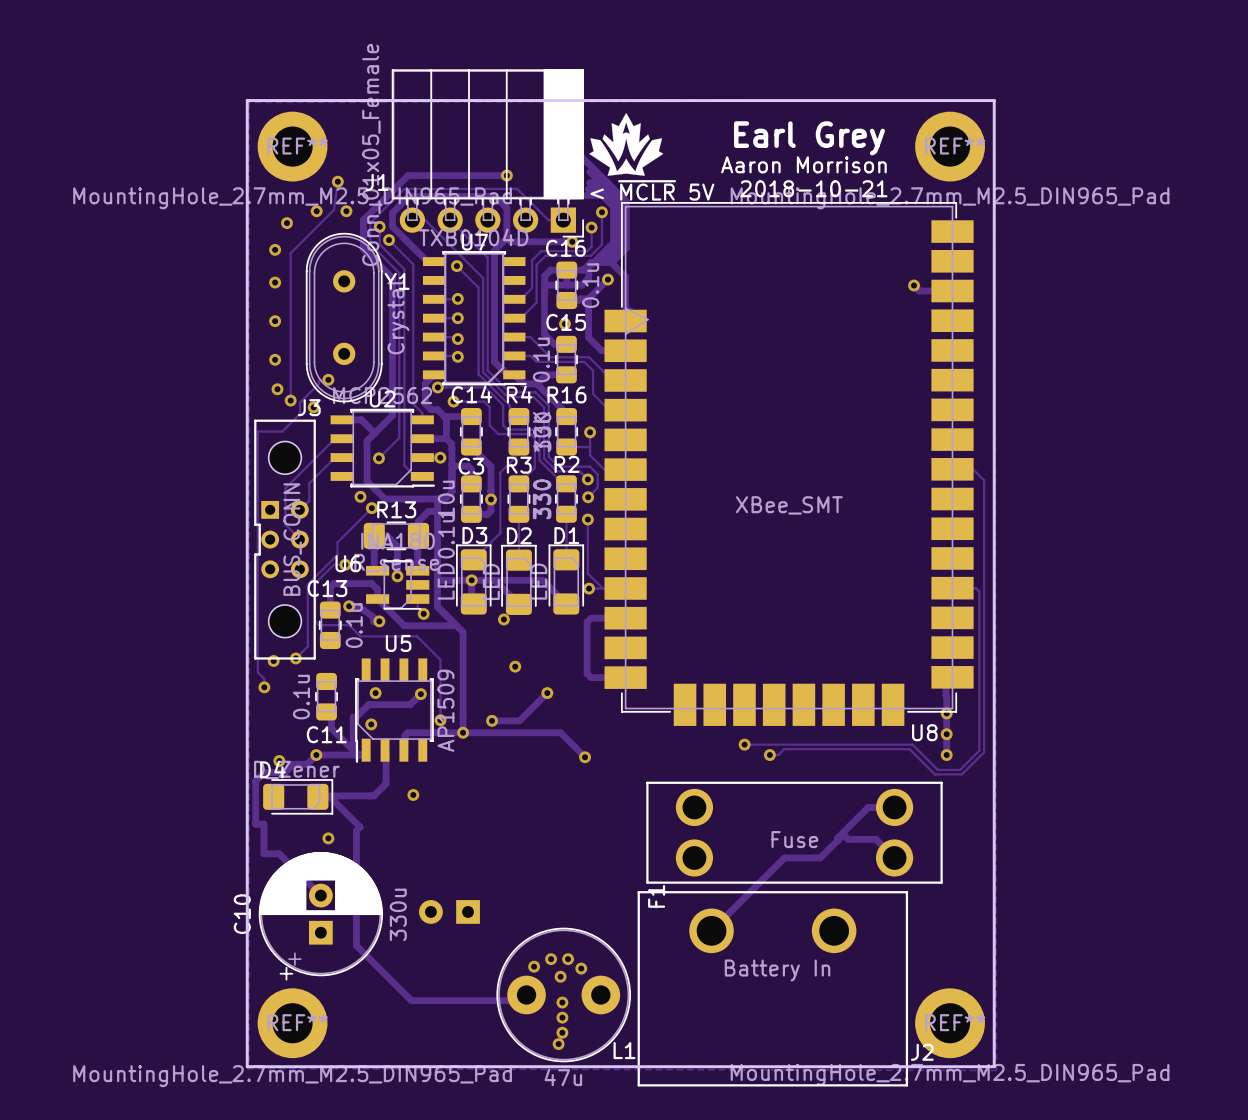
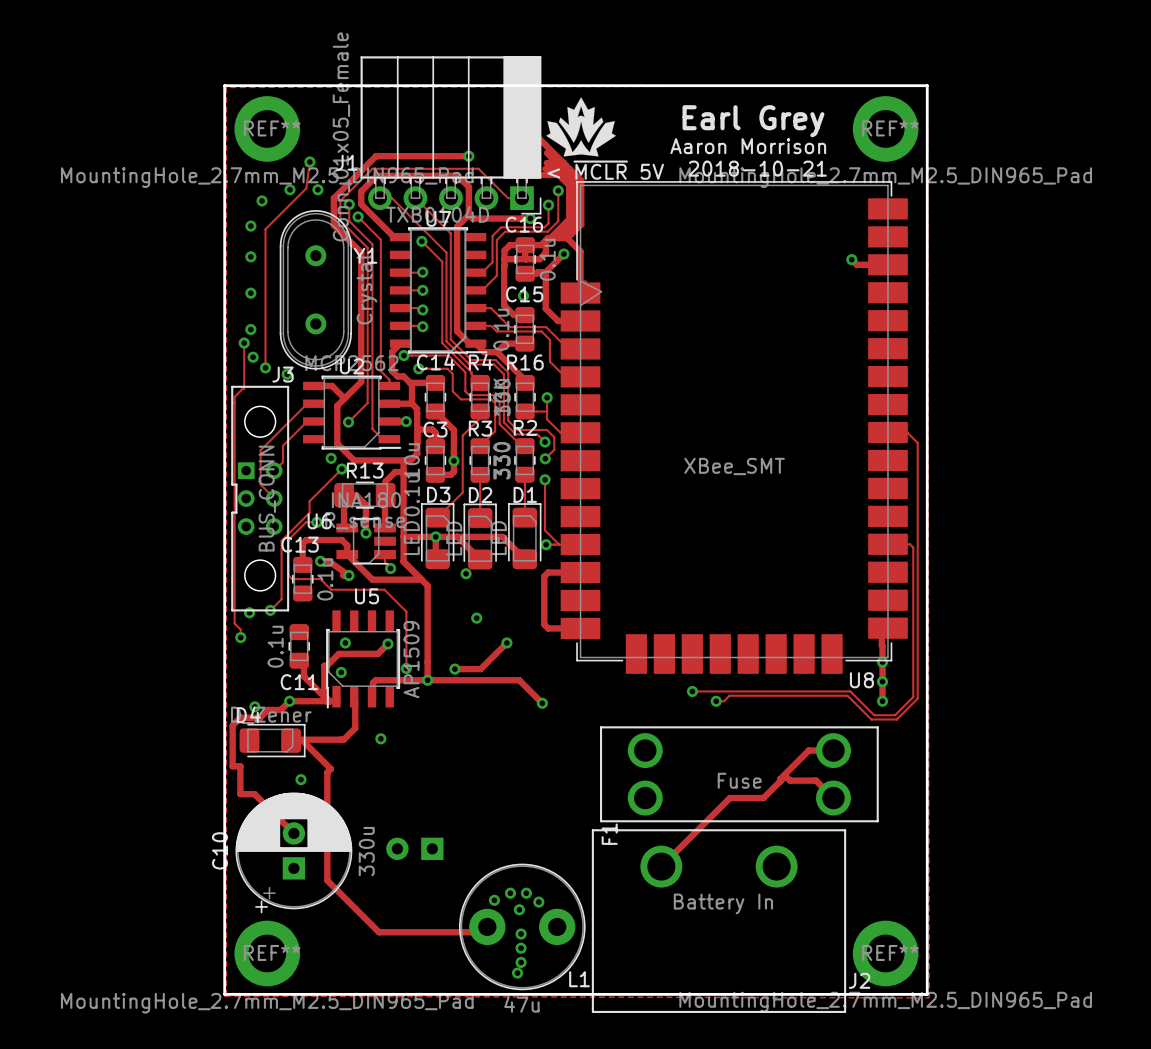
track: none -> (244, 343) (244, 389)
track: (328, 379) (318, 380) (318, 383) (300, 402) (300, 413) (282, 431) (257, 431) -> (244, 387) (234, 396)
via position: (328, 379) -> (244, 343)

